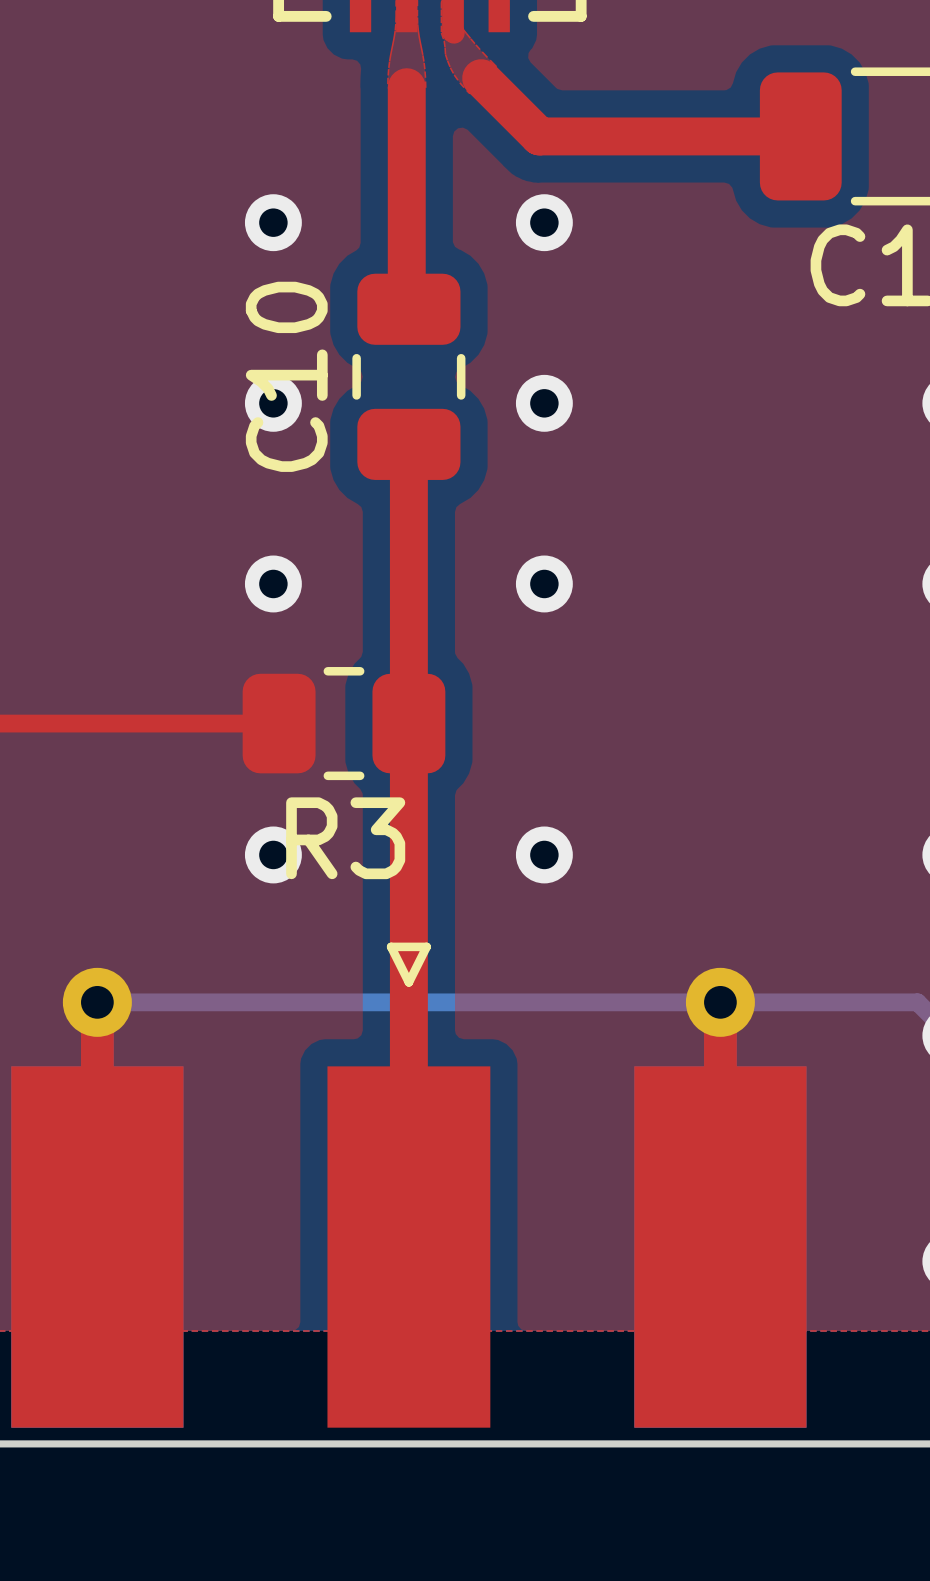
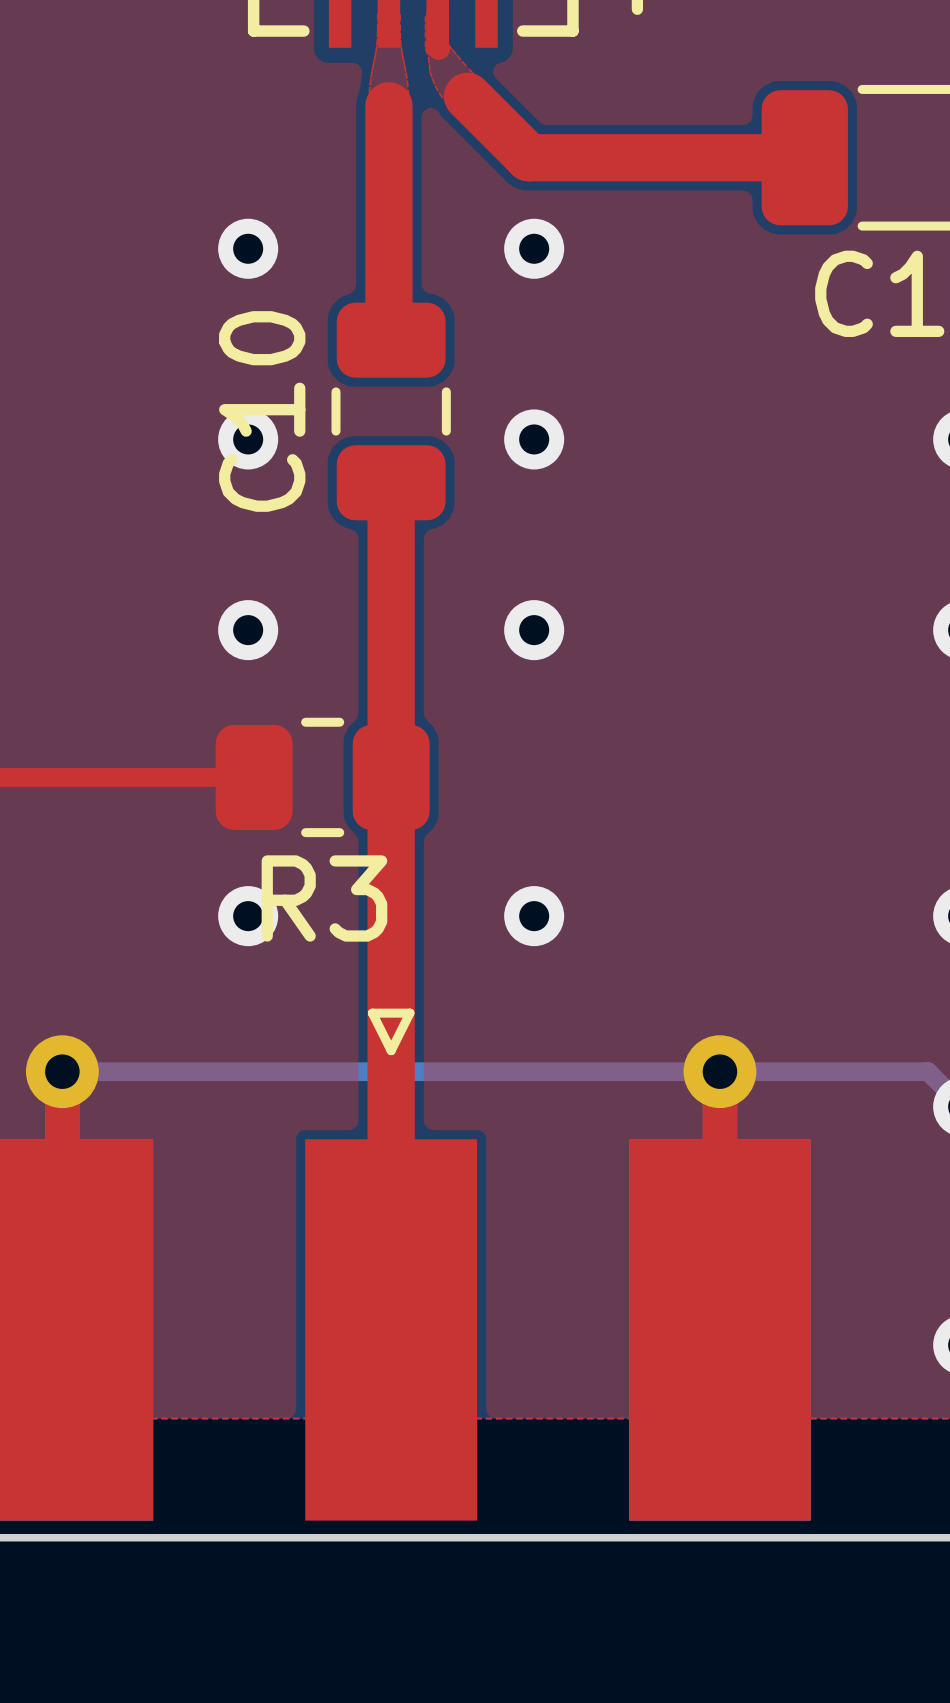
top track width: thin (481, 78) (539, 136) (800, 136) -> thick (467, 96) (528, 157) (804, 157)
top track width: thin (406, 87) (406, 307) (408, 309) -> thick (388, 105) (388, 337) (391, 340)
top track width: thin (408, 444) (408, 1247) -> thick (391, 482) (391, 1329)

